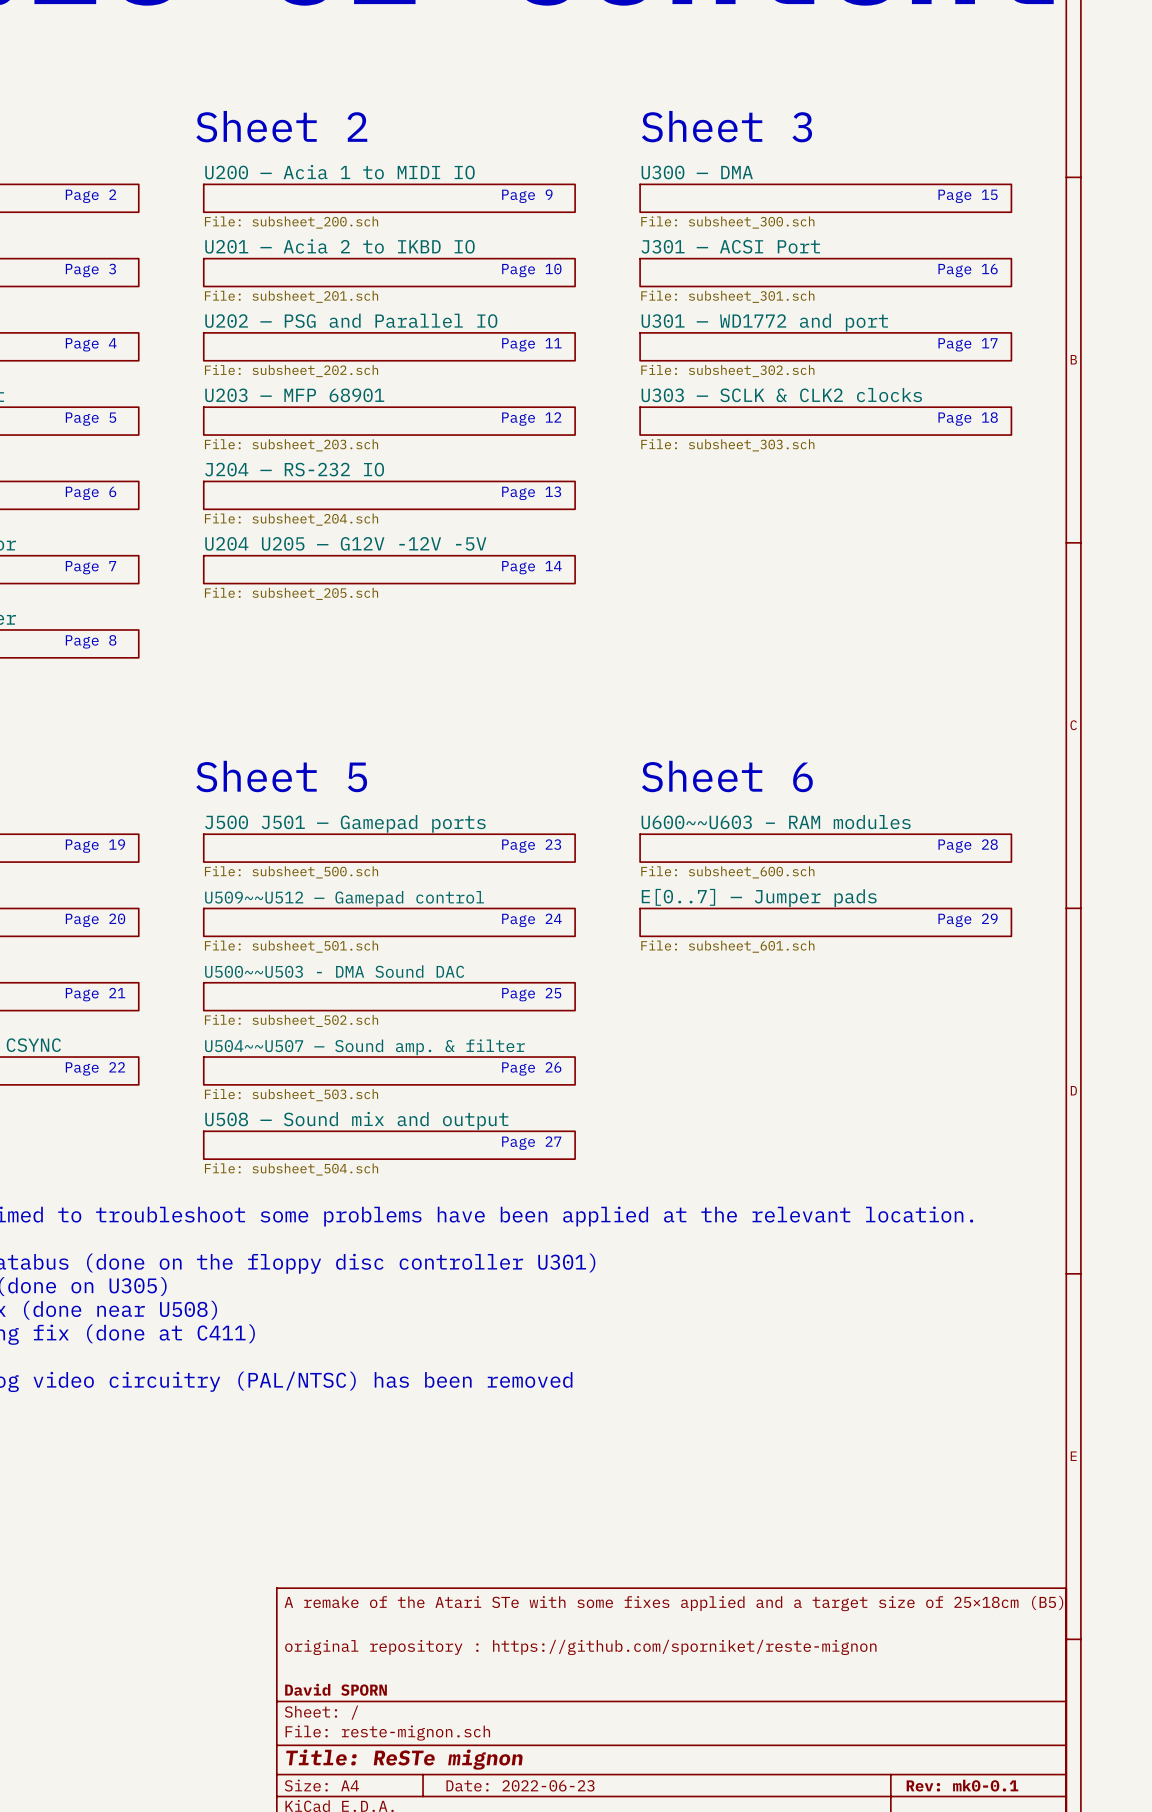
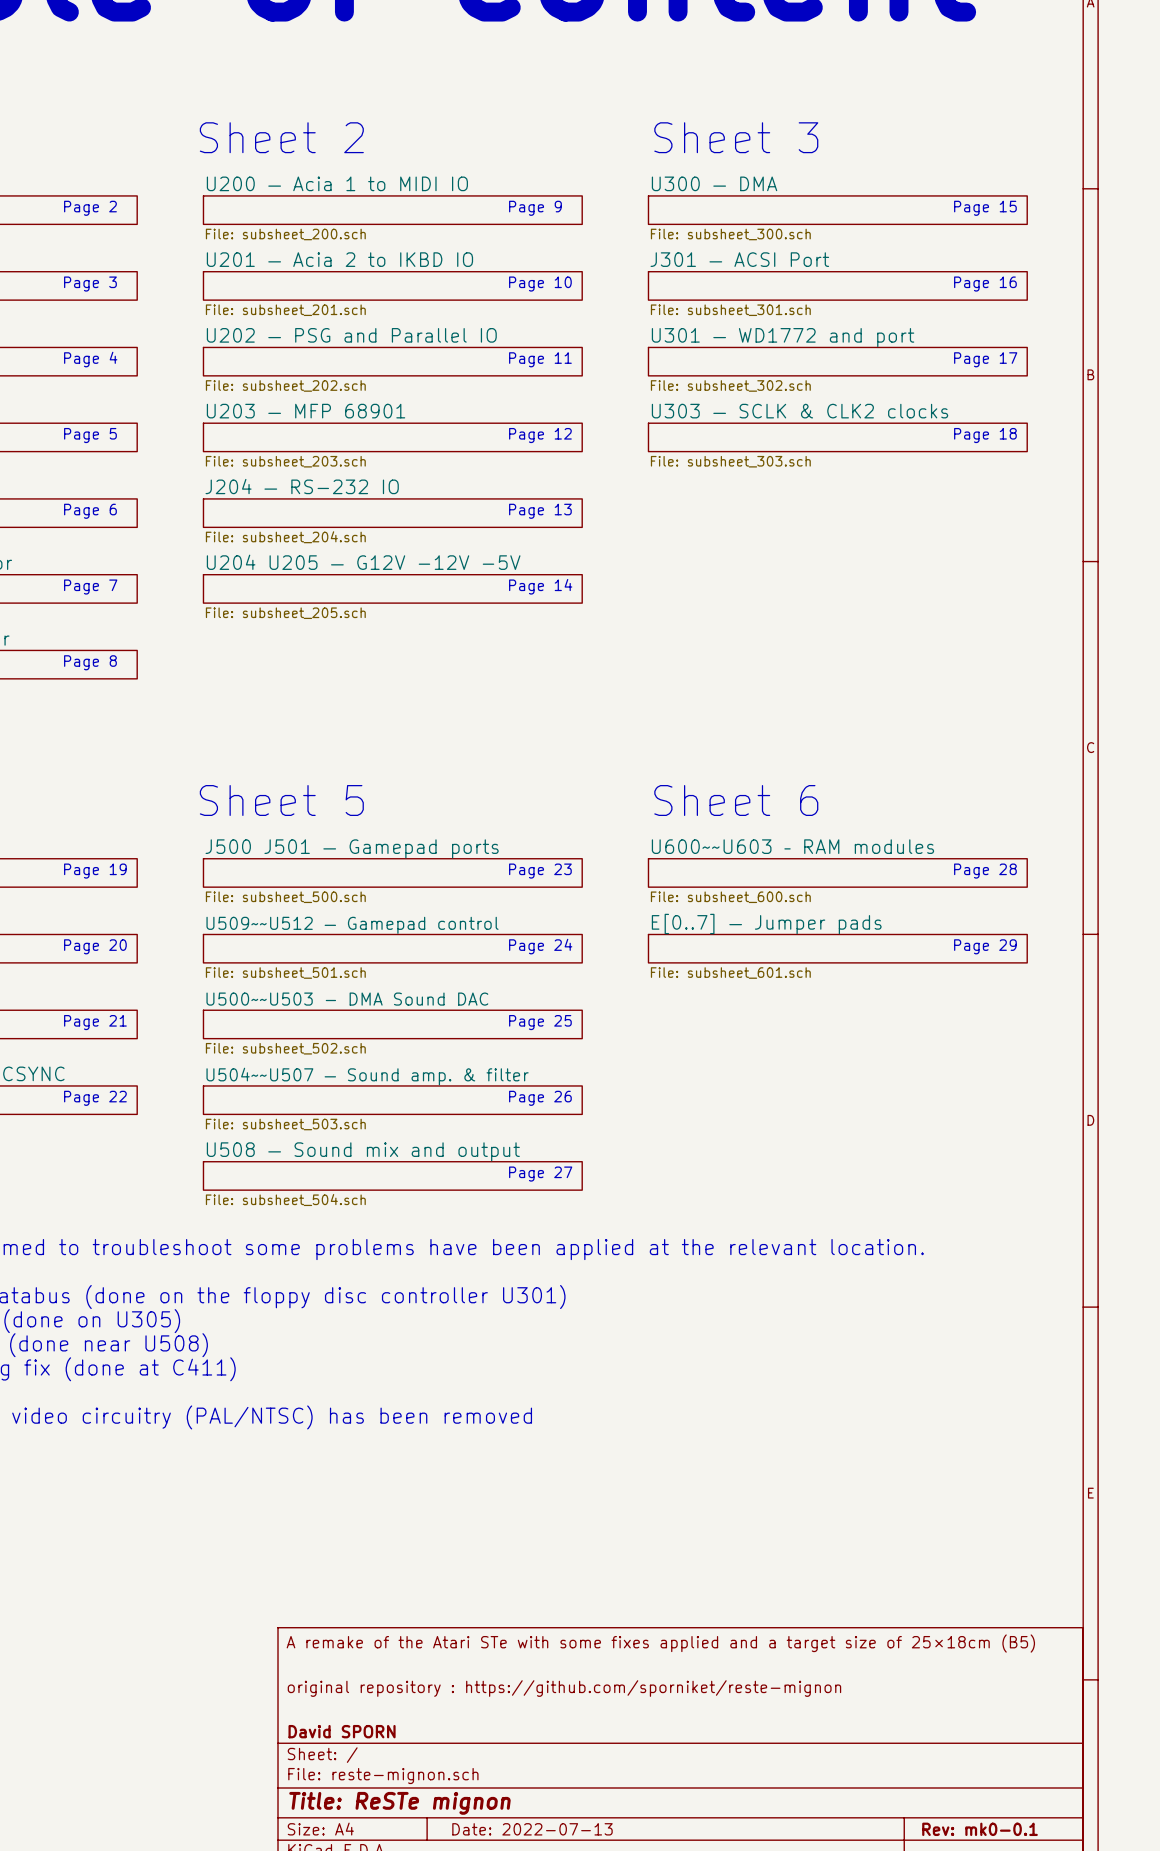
title block: Date: 2022-06-23 (520, 1785) -> Date: 2022-07-13 (532, 1829)

